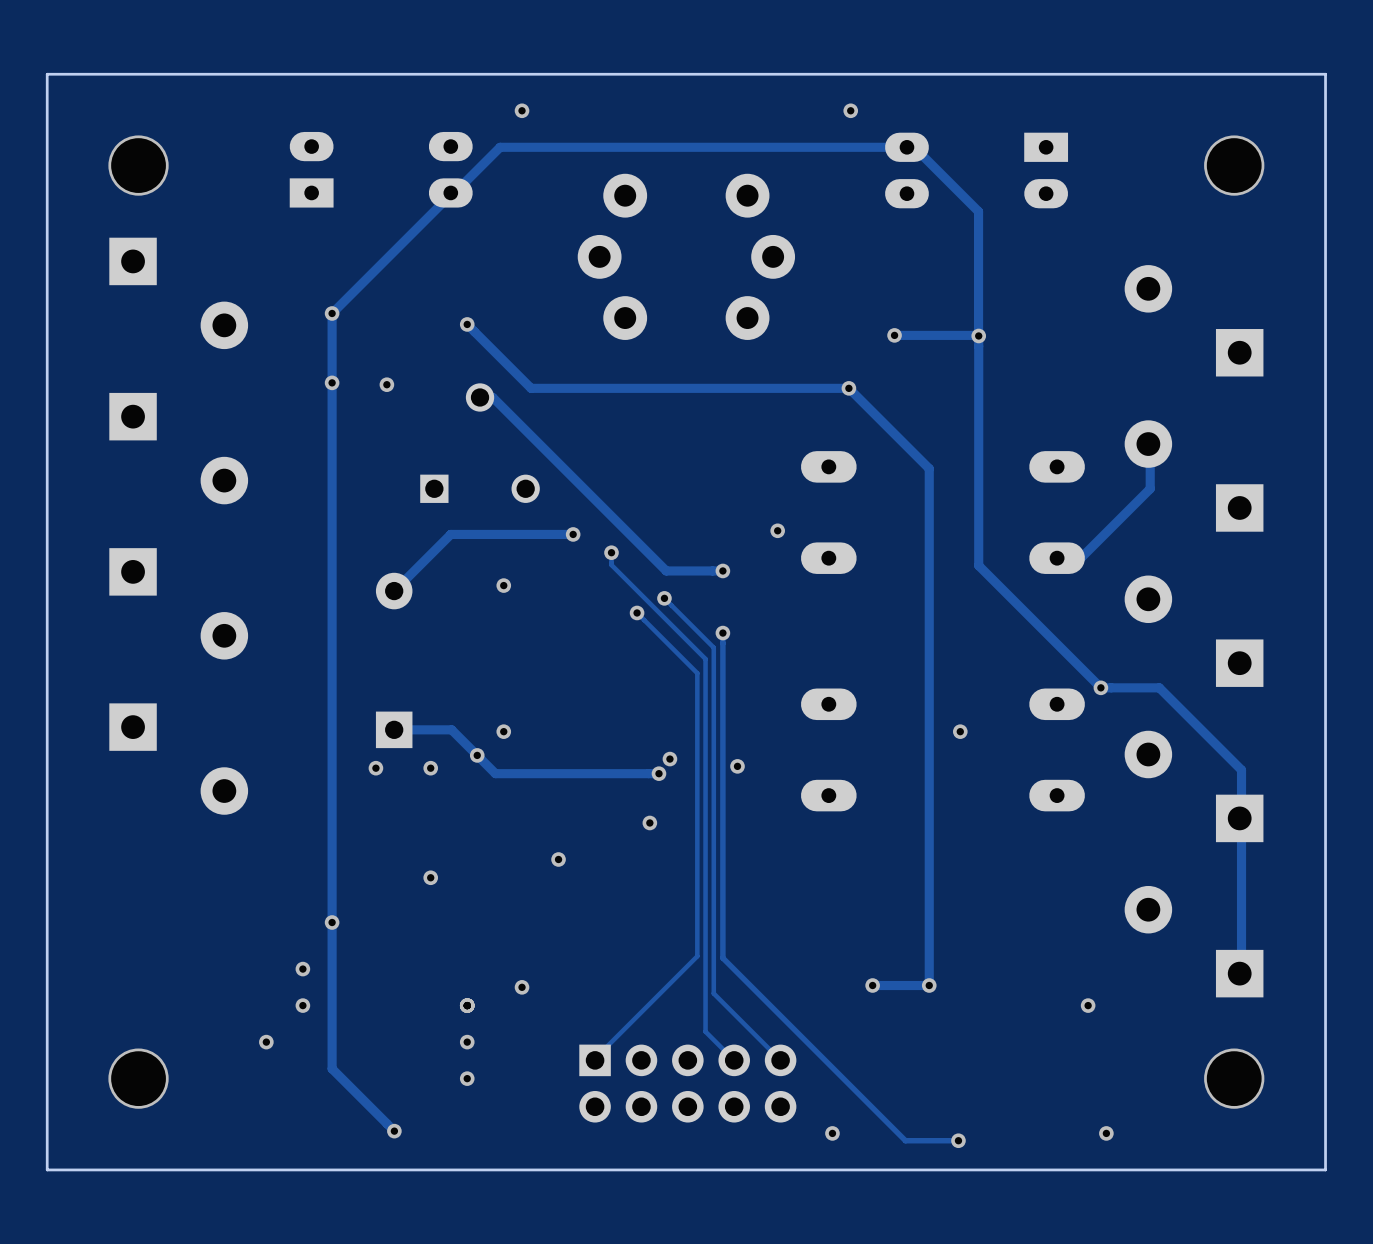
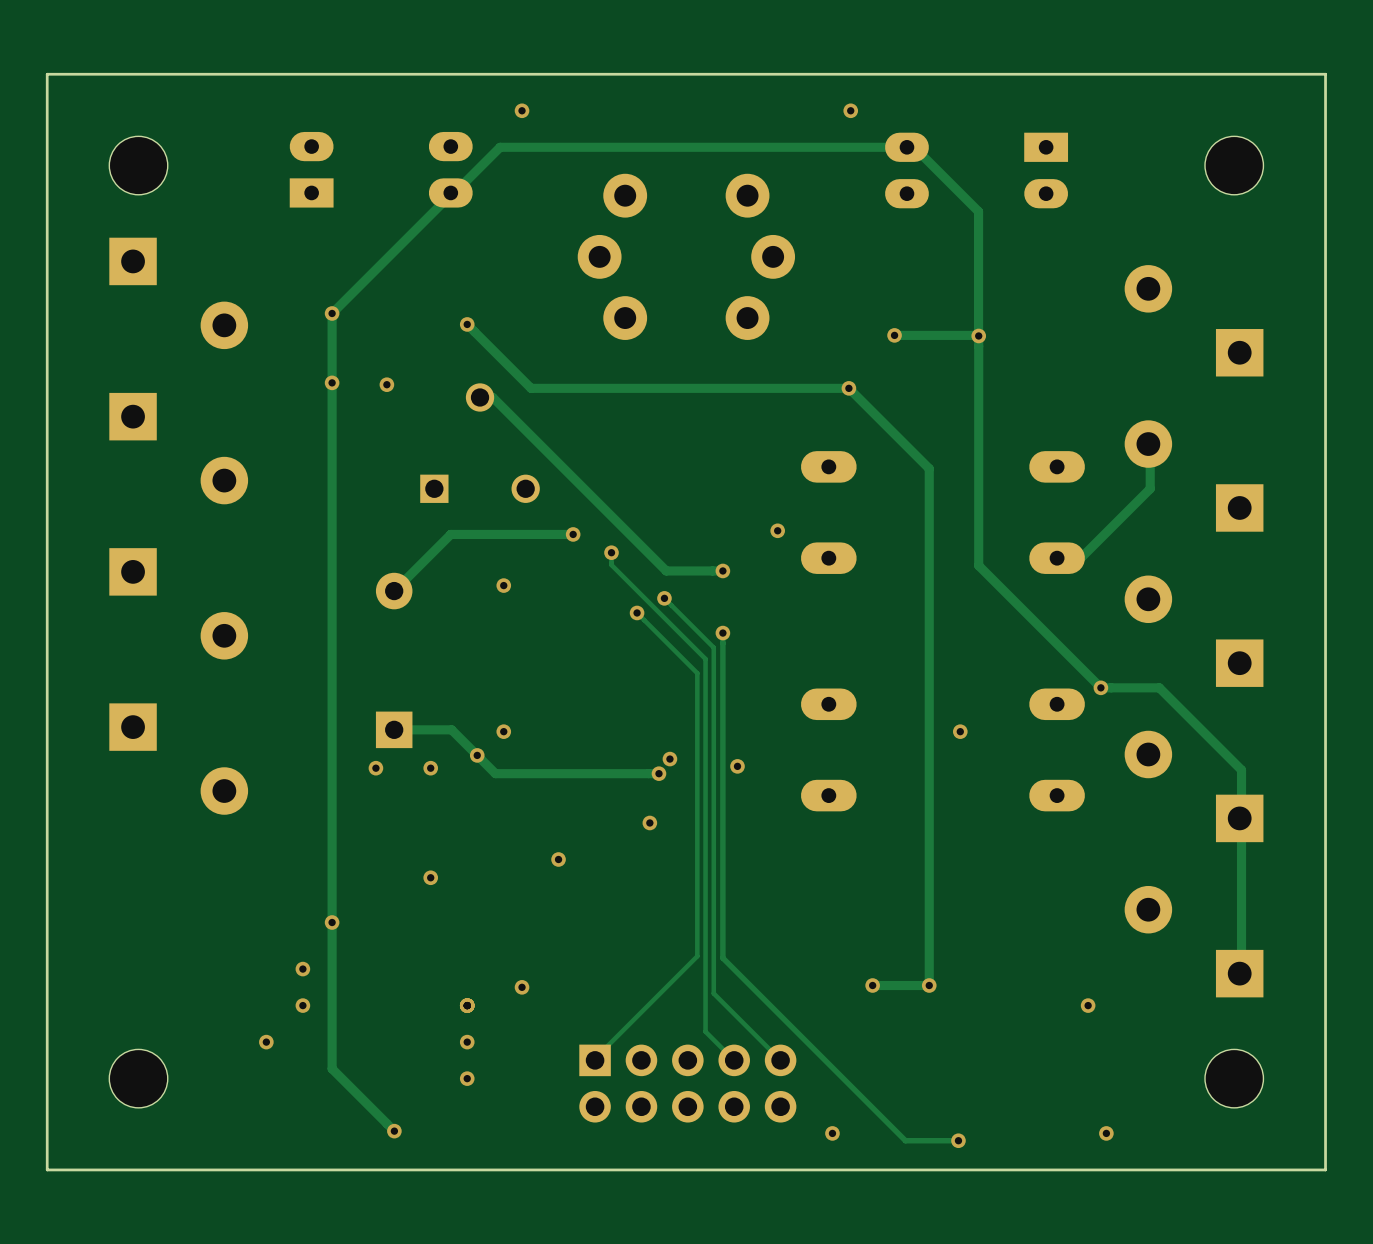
via: (138, 165) -> none
part: none -> (138, 165)
via: (1234, 165) -> none
part: none -> (1234, 165)
via: (138, 1078) -> none
part: none -> (138, 1078)
via: (1234, 1078) -> none
part: none -> (1234, 1078)

